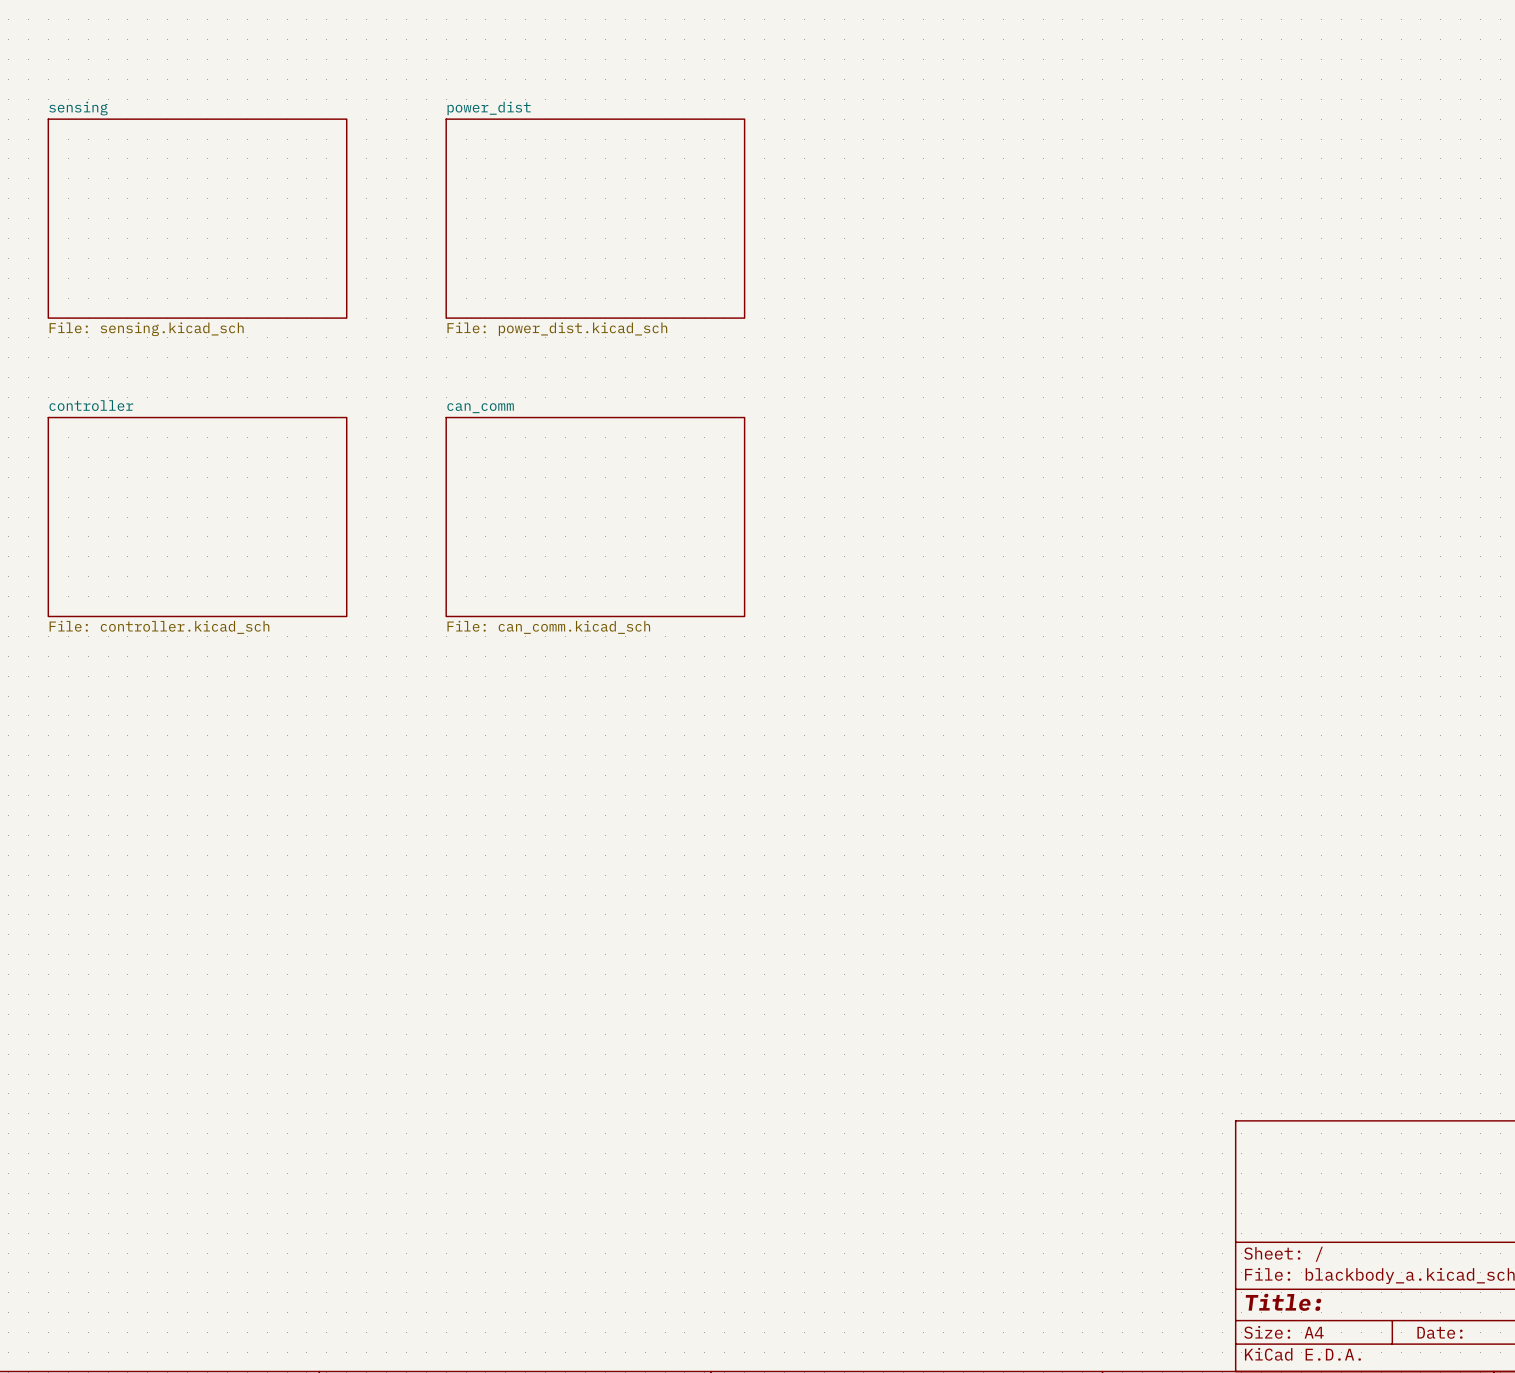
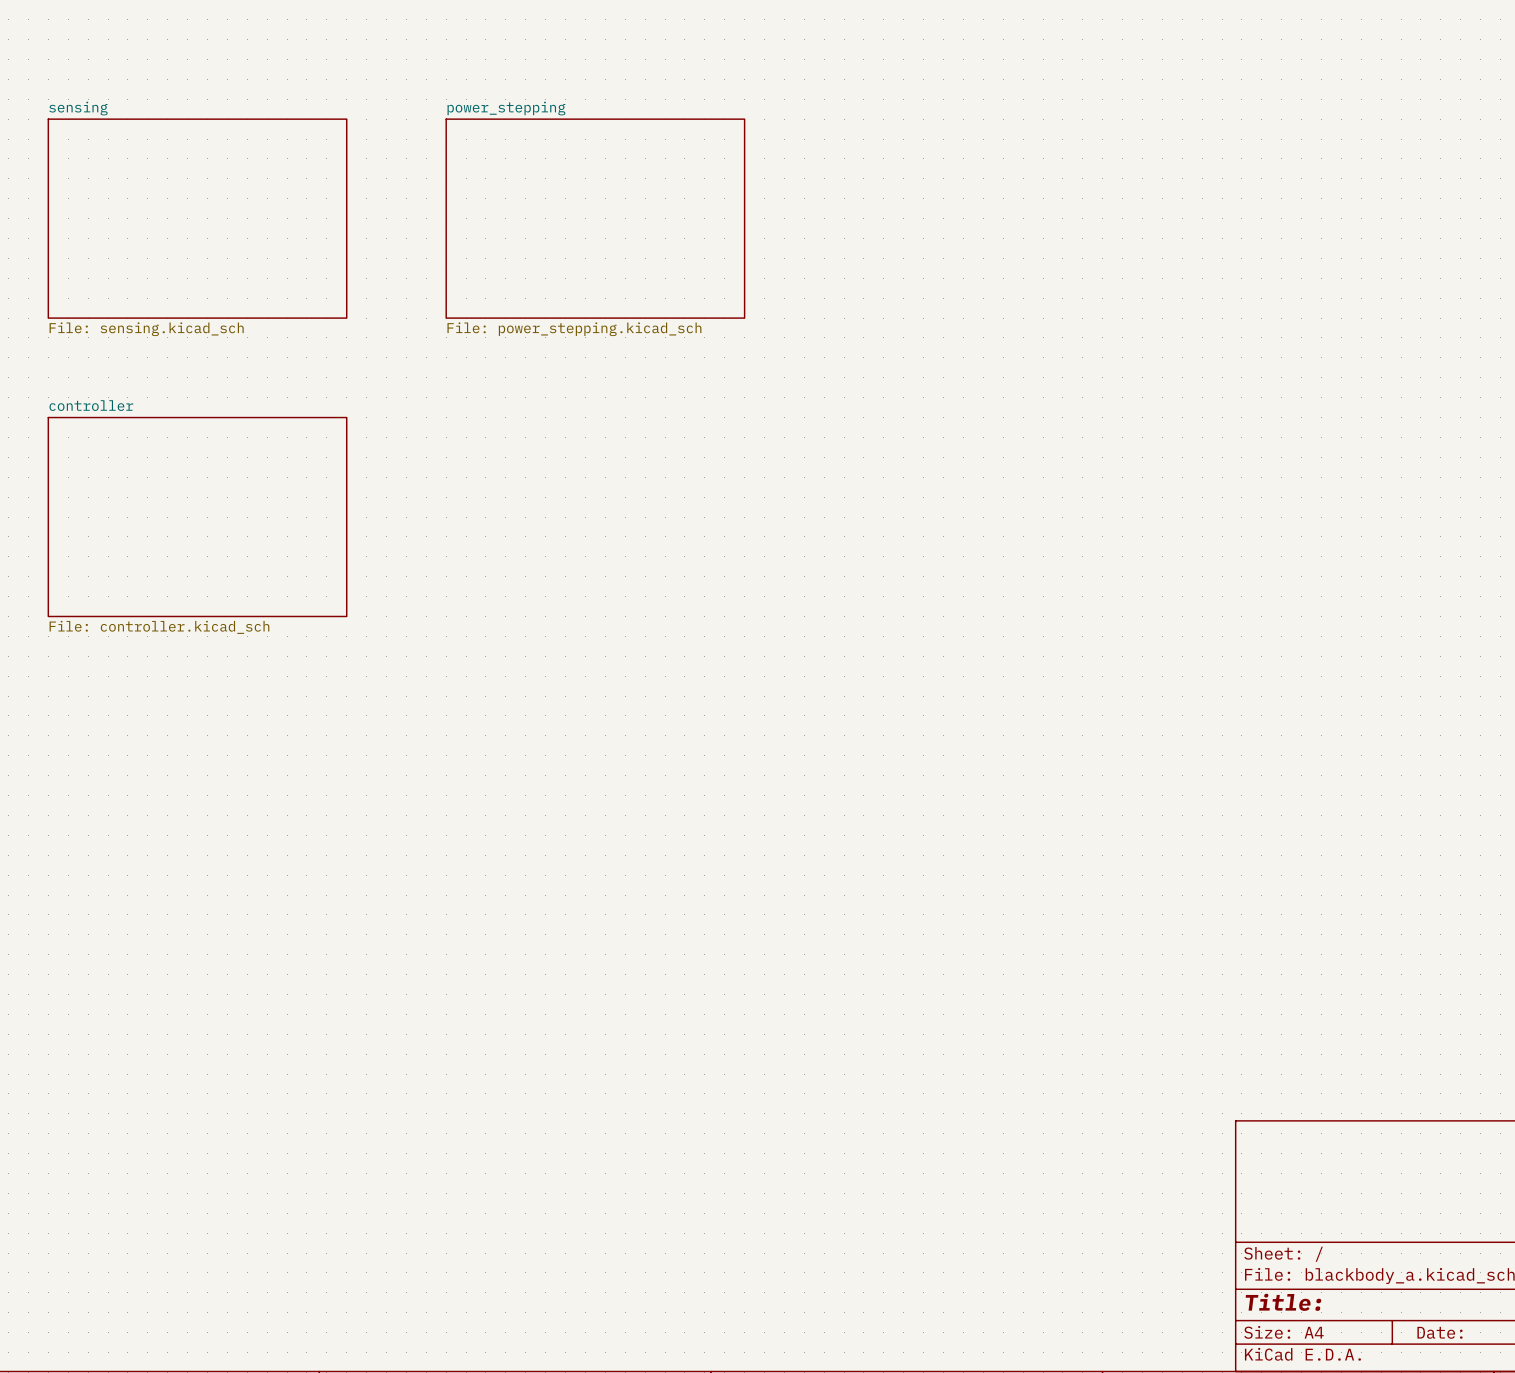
sheet power_dist name: power_dist (489, 108) -> power_stepping (506, 108)
sheet power_dist value: File: power_dist.kicad_sch (557, 329) -> File: power_stepping.kicad_sch (574, 329)
sheet can_comm: File: can_comm.kicad_sch (595, 517) -> none

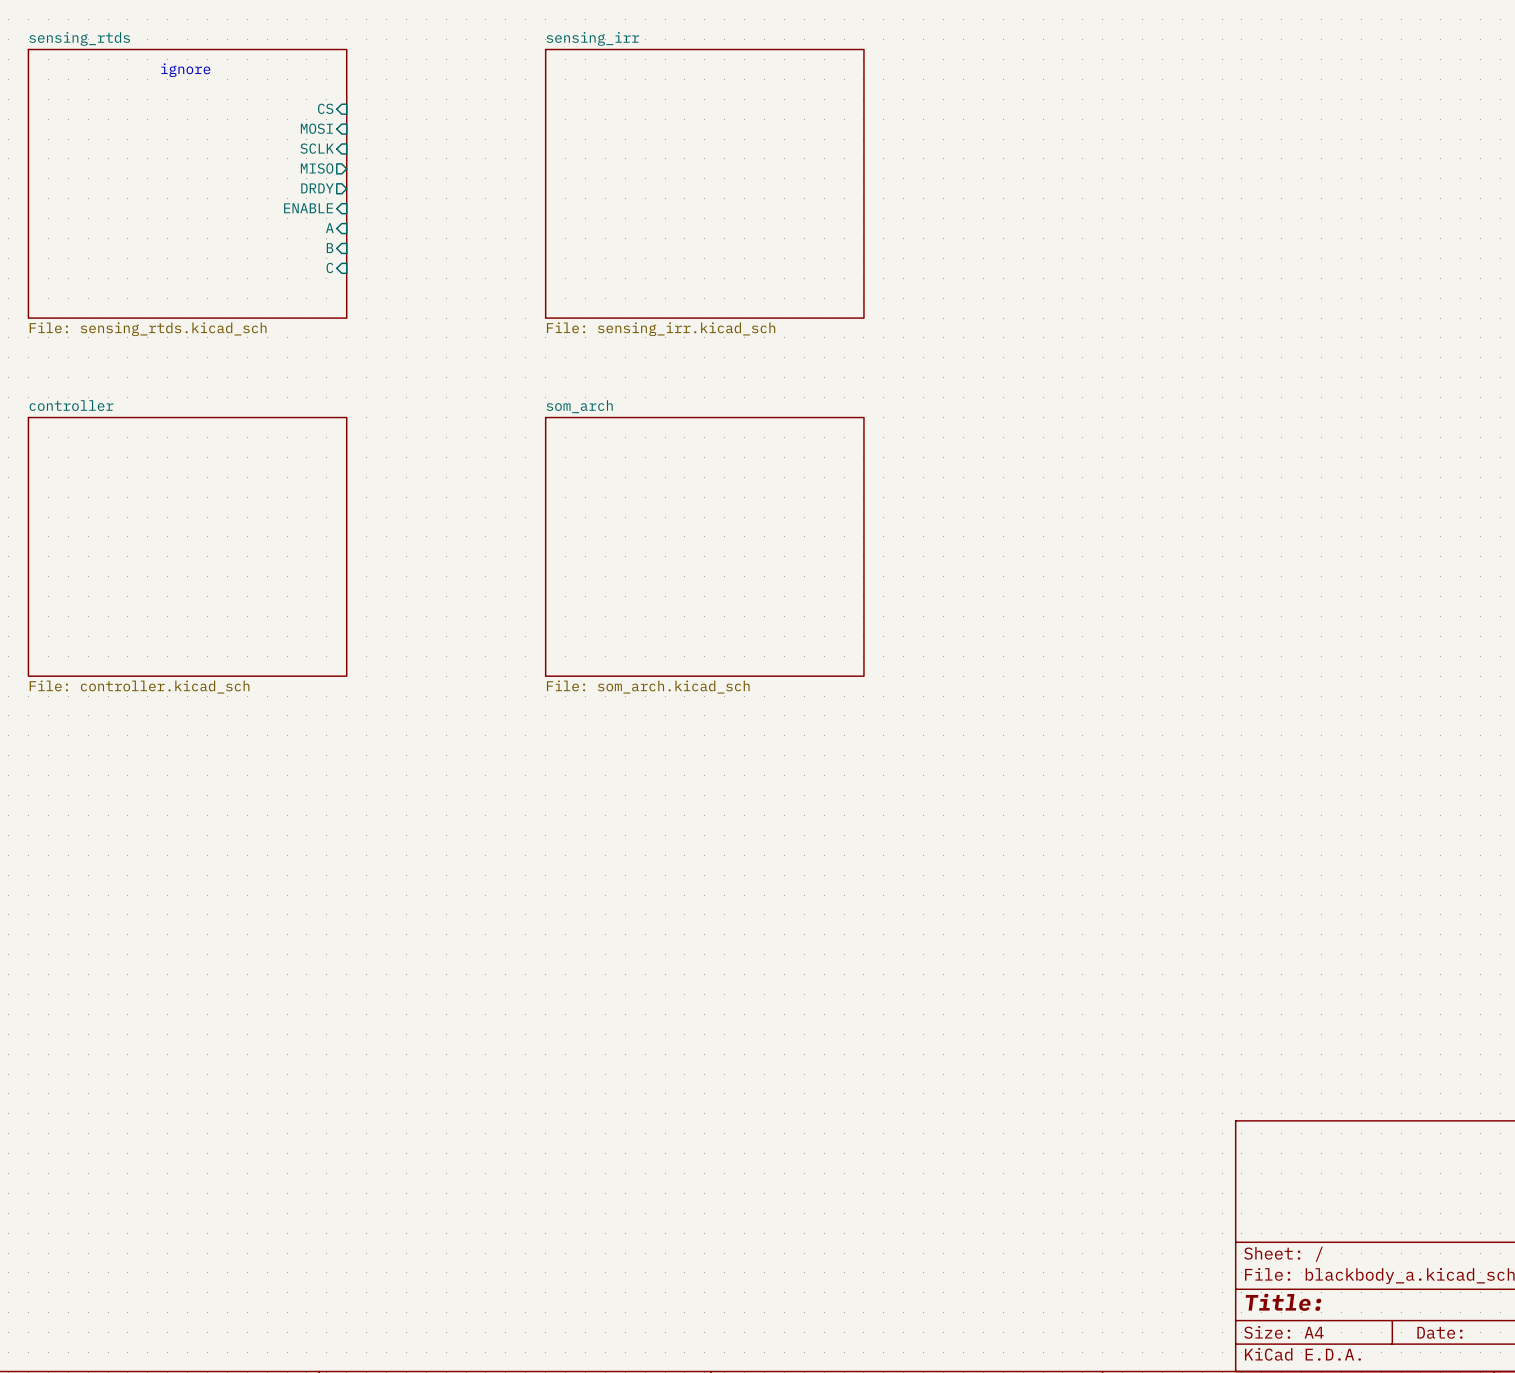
text: none -> ignore (185, 70)
sheet pin: none -> CS (325, 108)
sheet pin: none -> MOSI (316, 128)
sheet pin: none -> SCLK (317, 148)
sheet pin: none -> MISO (317, 168)
sheet sensing_rtds: none -> File: sensing_rtds.kicad_sch (187, 183)
sheet sensing_irr: none -> File: sensing_irr.kicad_sch (704, 183)
sheet pin: none -> DRDY (317, 188)
sheet pin: none -> ENABLE (308, 208)
sheet sensing: File: sensing.kicad_sch (197, 218) -> none
sheet power_stepping: File: power_stepping.kicad_sch (595, 218) -> none
sheet pin: none -> A (329, 228)
sheet pin: none -> B (330, 248)
sheet pin: none -> C (329, 267)
sheet controller: File: controller.kicad_sch (197, 517) -> none
sheet controller: none -> File: controller.kicad_sch (187, 546)
sheet som_arch: none -> File: som_arch.kicad_sch (704, 546)

